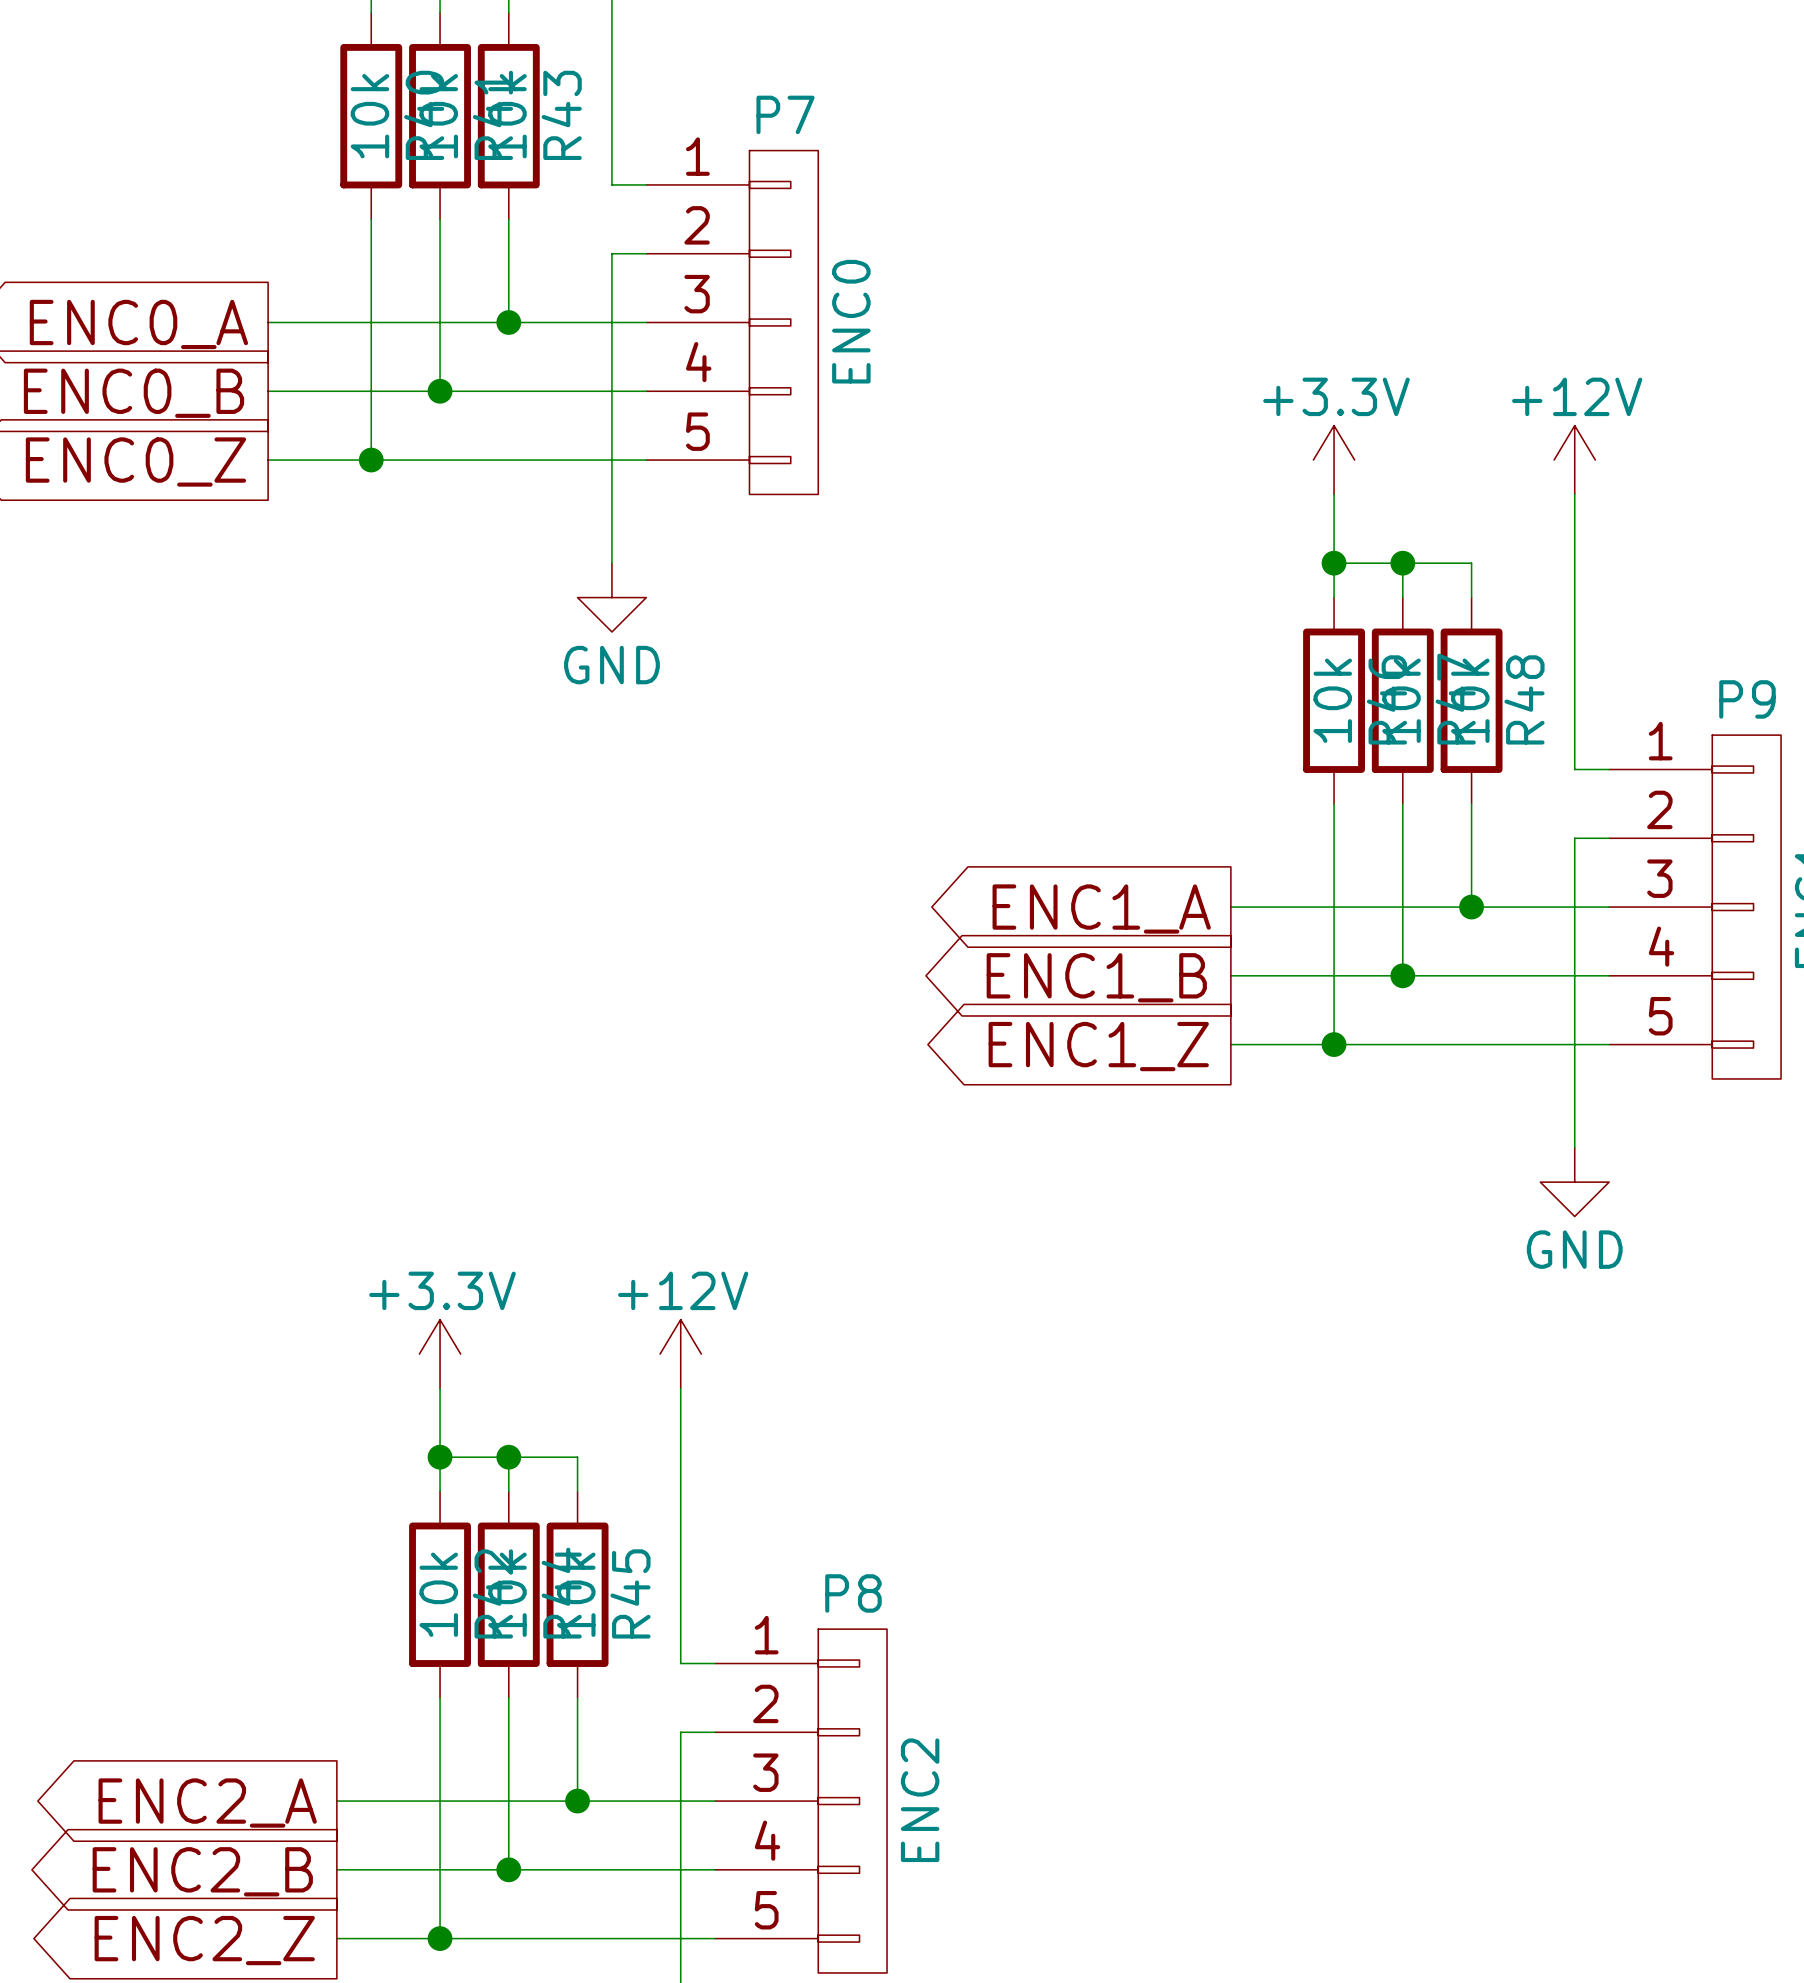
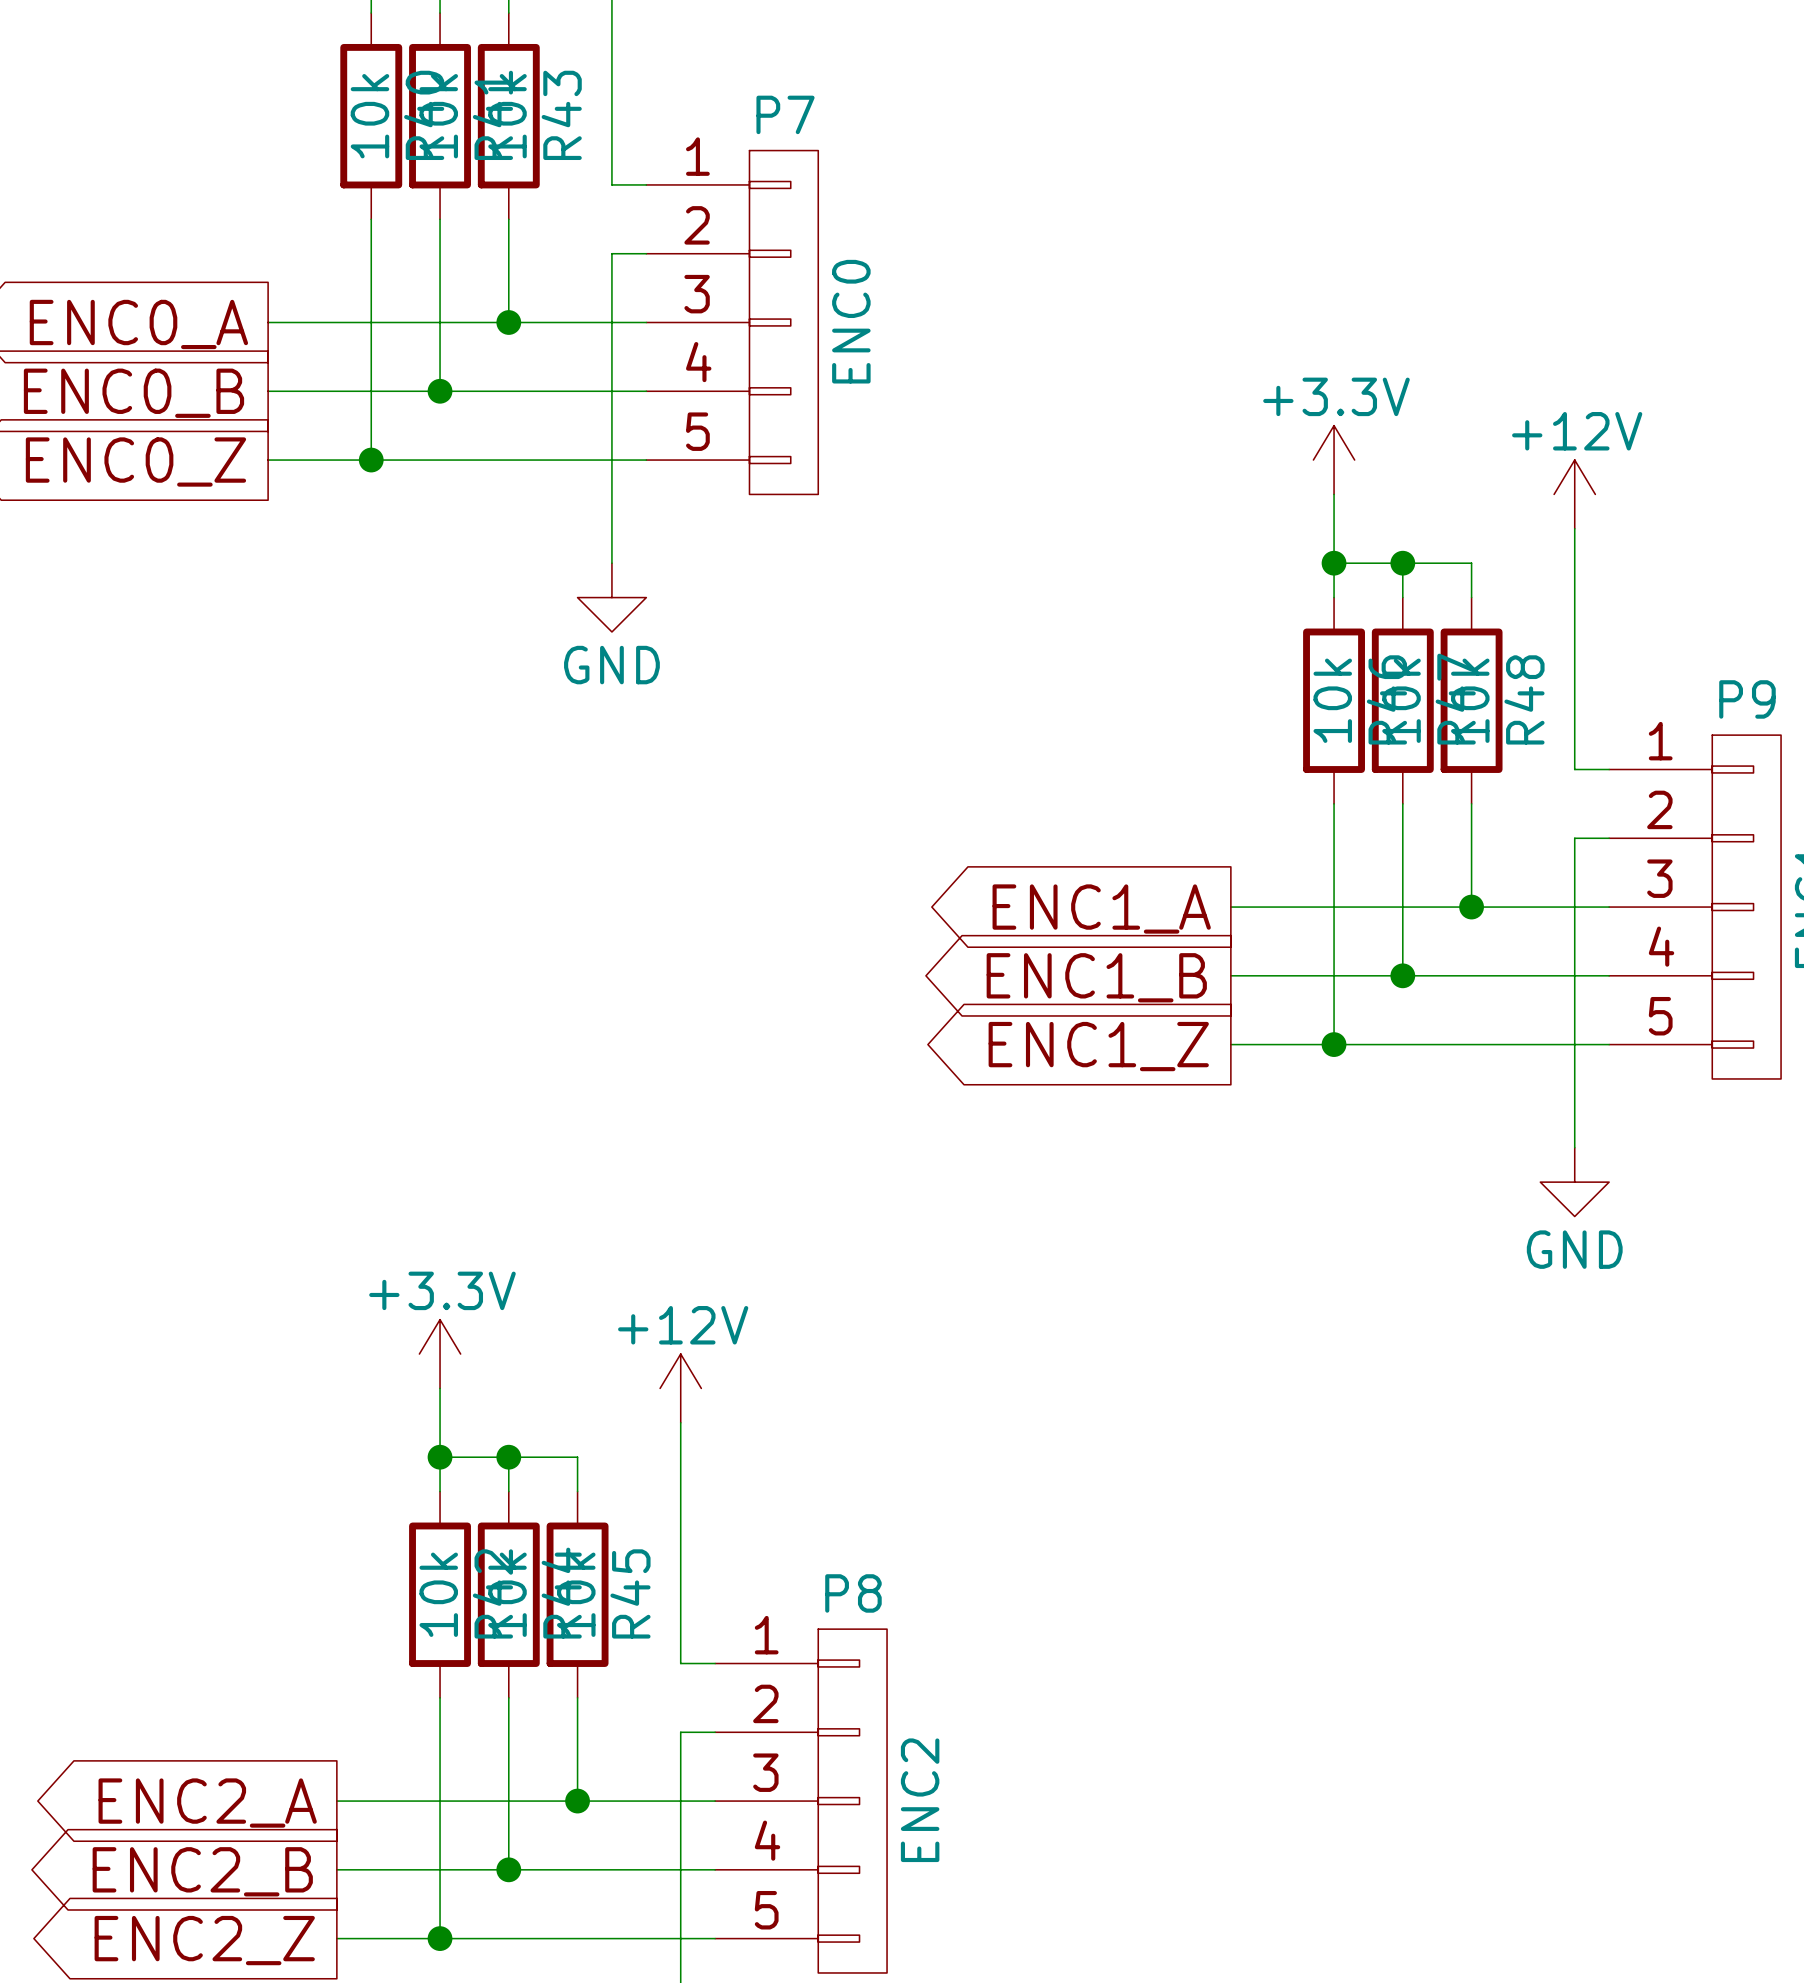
power symbol position: +12V (1574, 460) -> +12V (1574, 494)
power symbol position: +12V (680, 1354) -> +12V (680, 1388)

